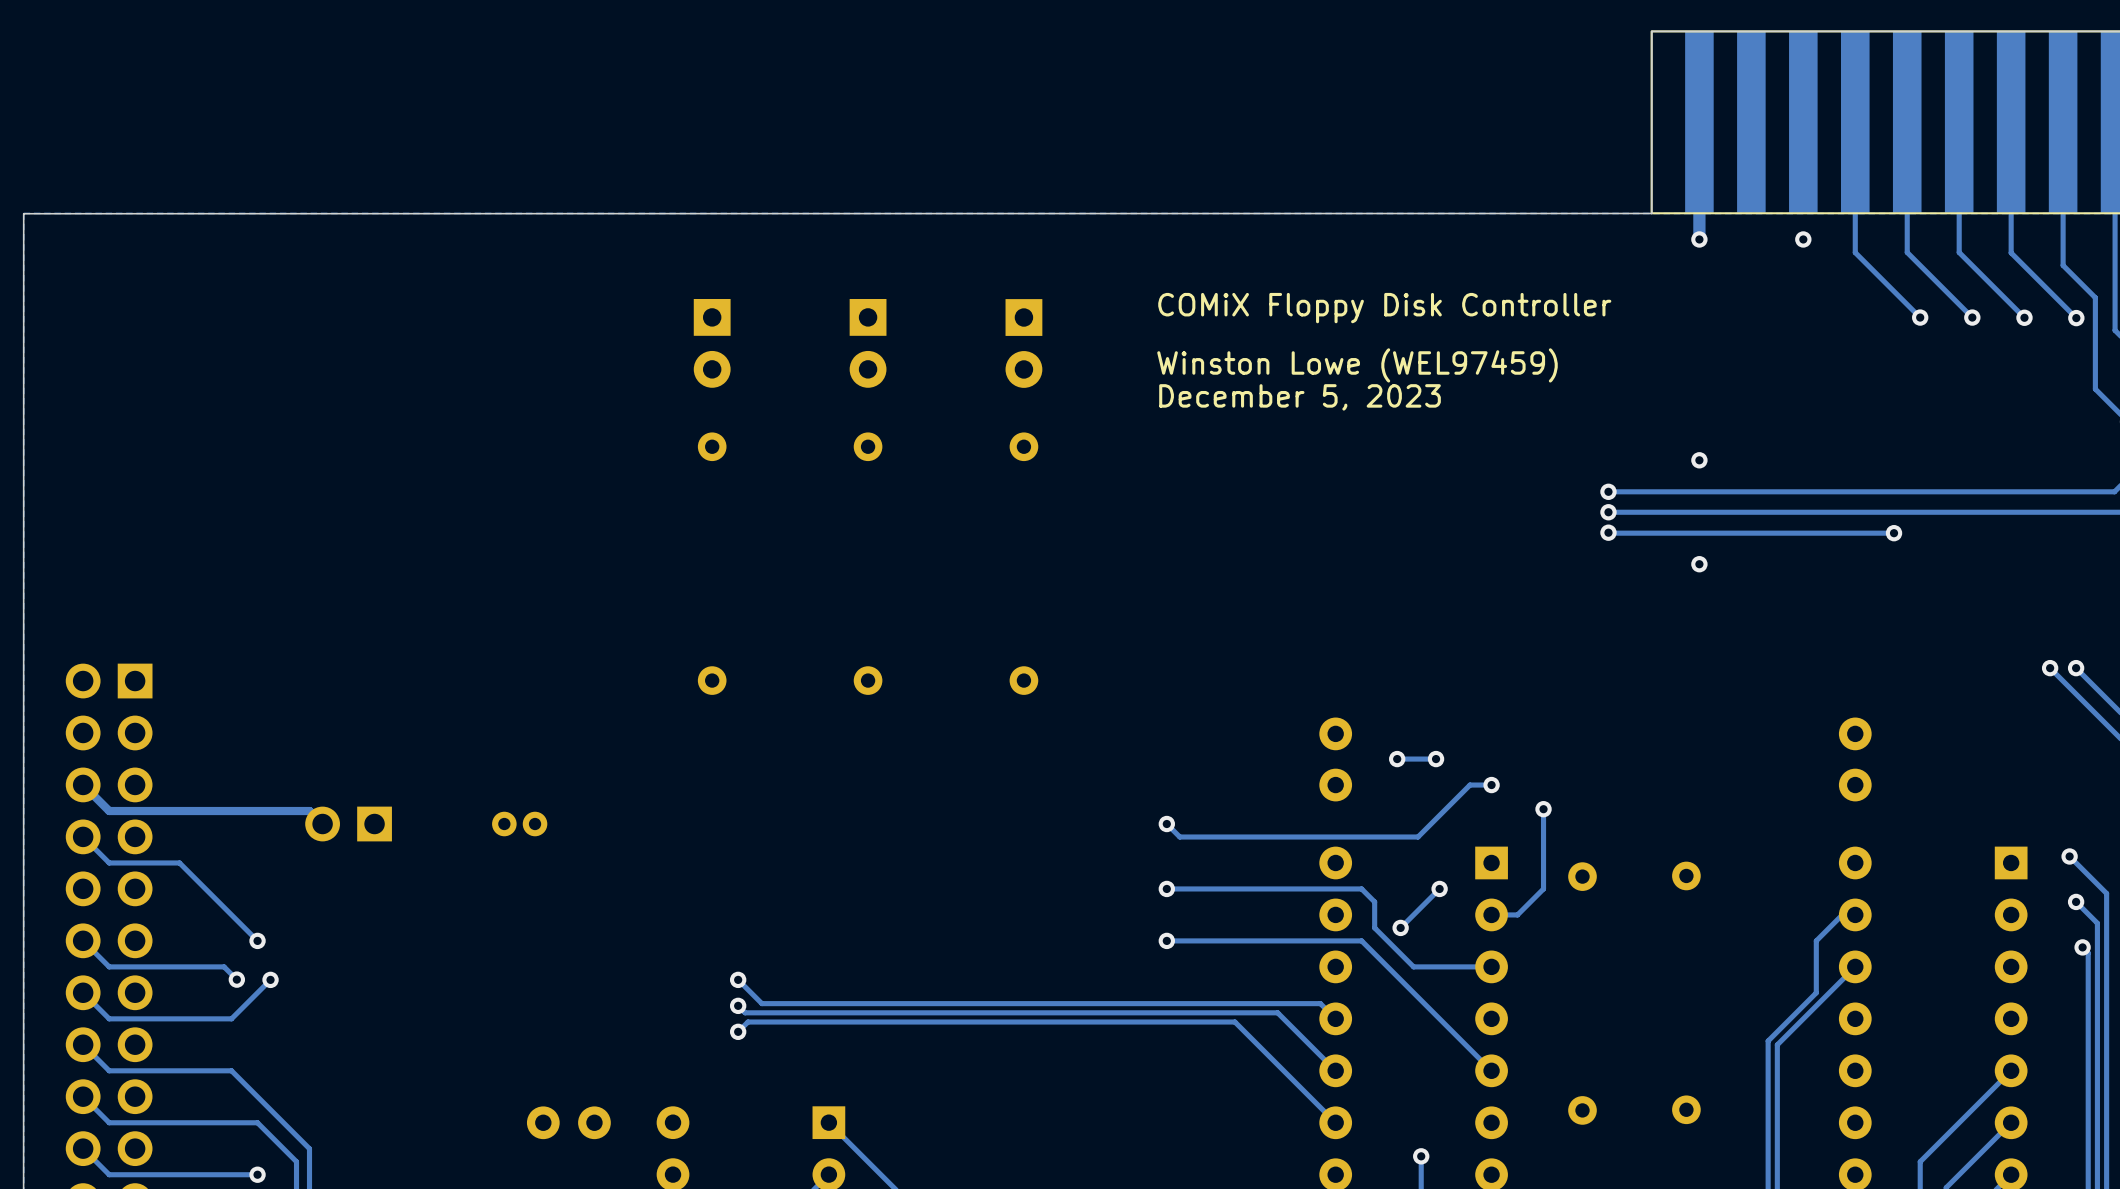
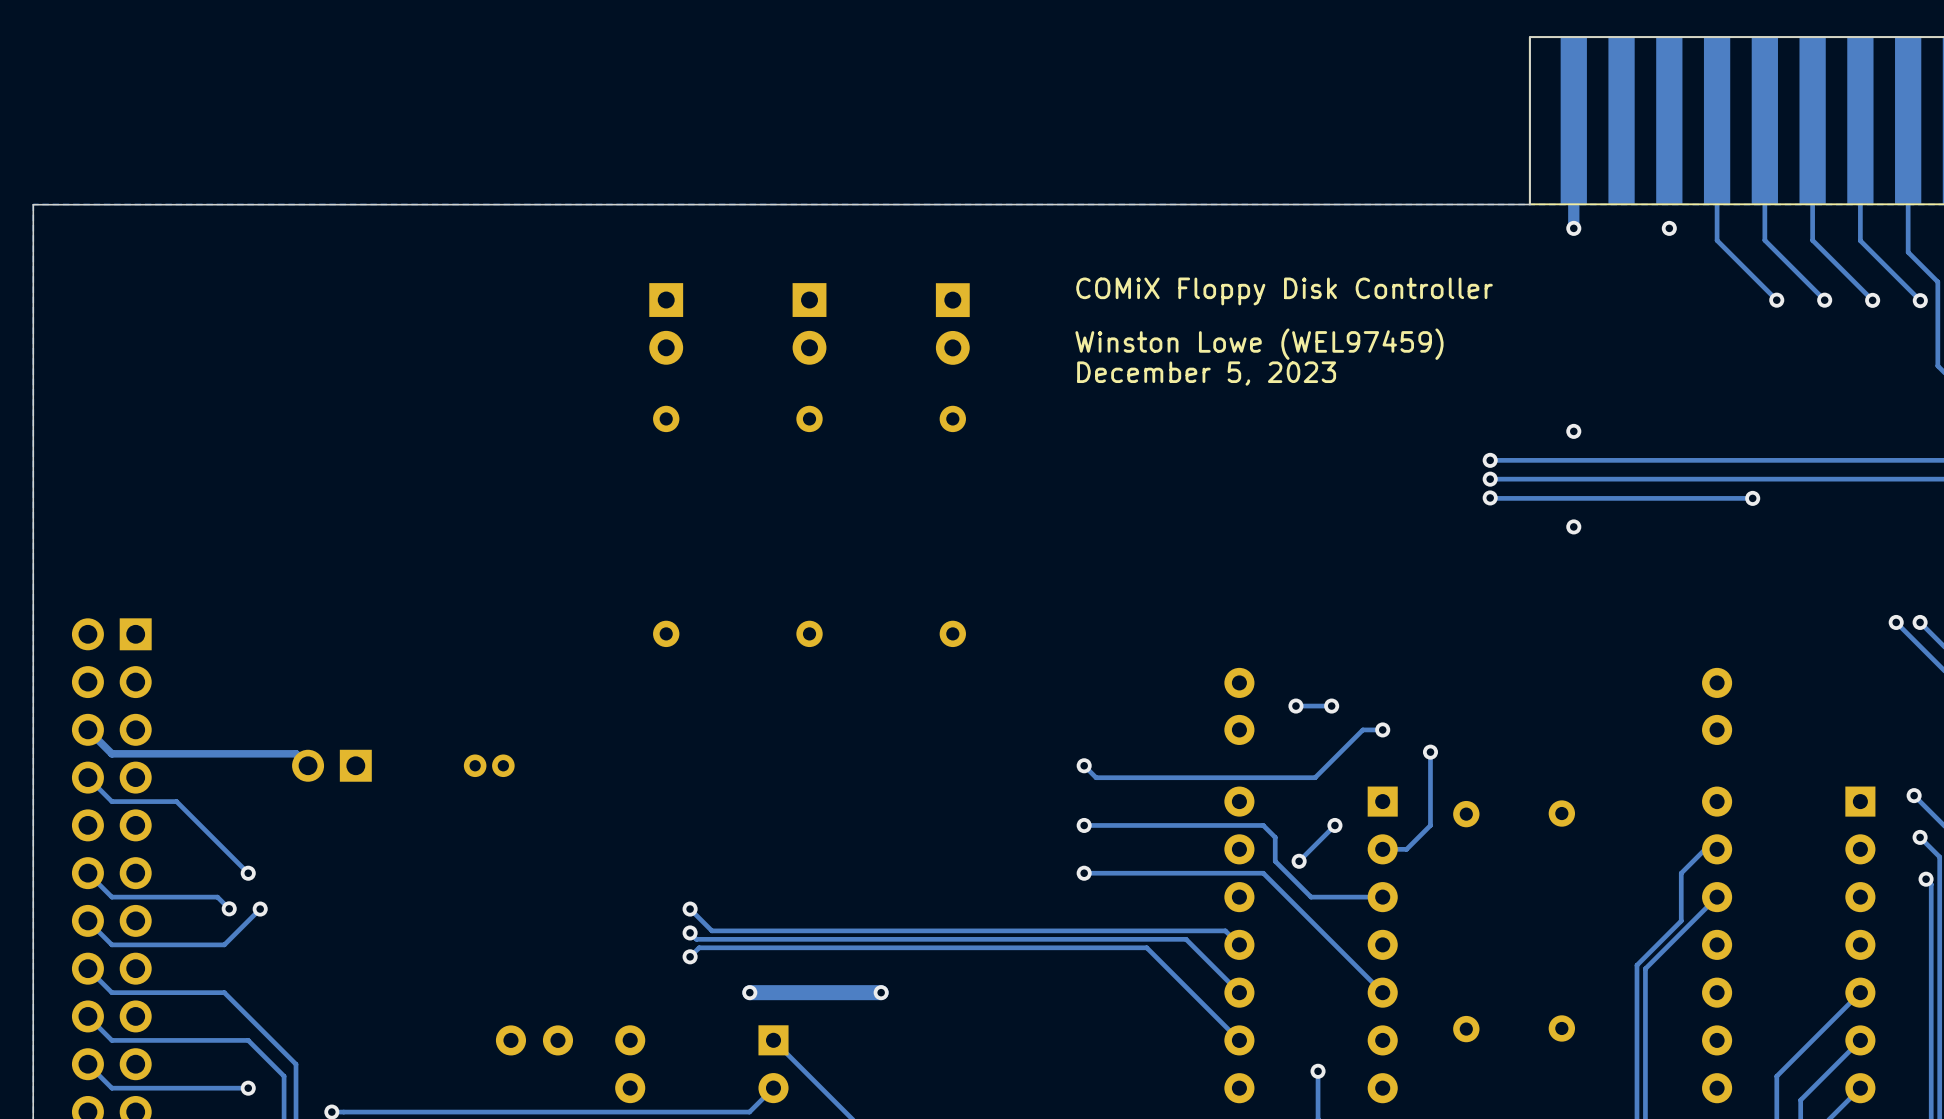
via: none -> (749, 992)
track: none -> (881, 992) (749, 992)
via: none -> (881, 992)

